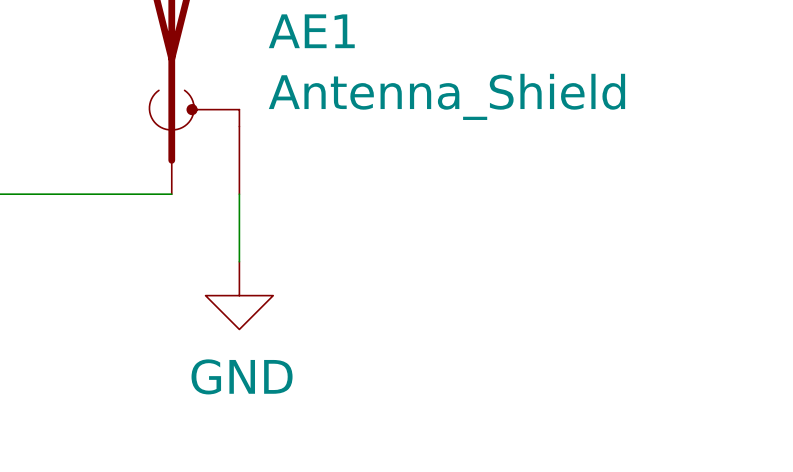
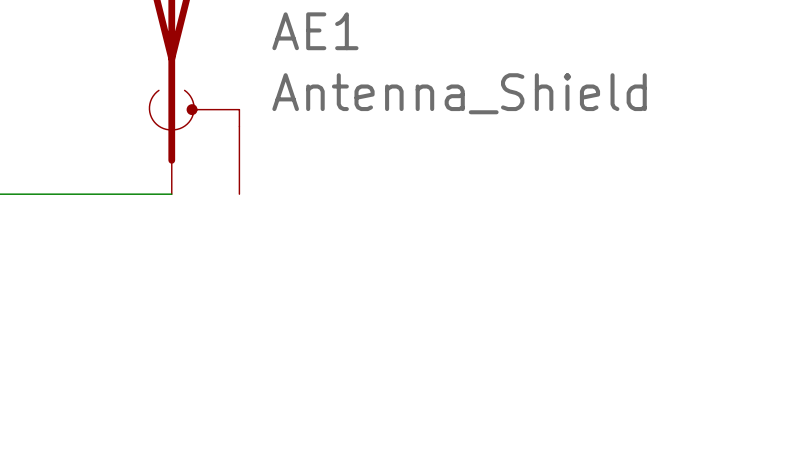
wire: (239, 194) (239, 261) -> none
power symbol: GND (239, 295) -> none

